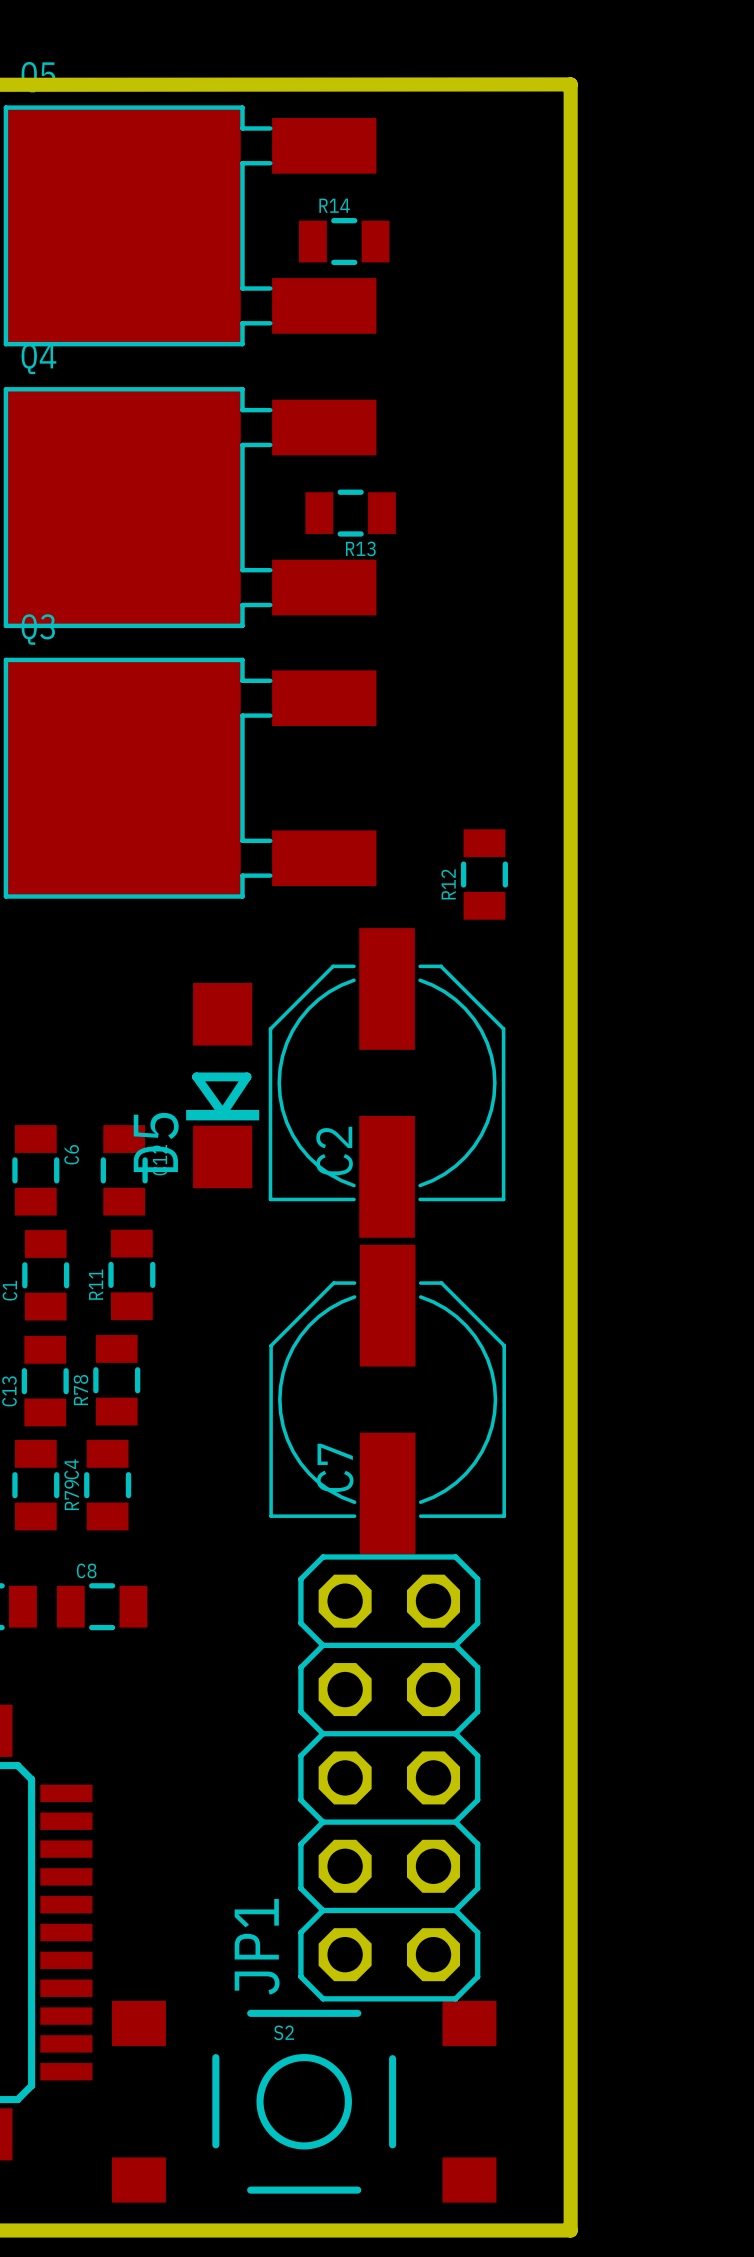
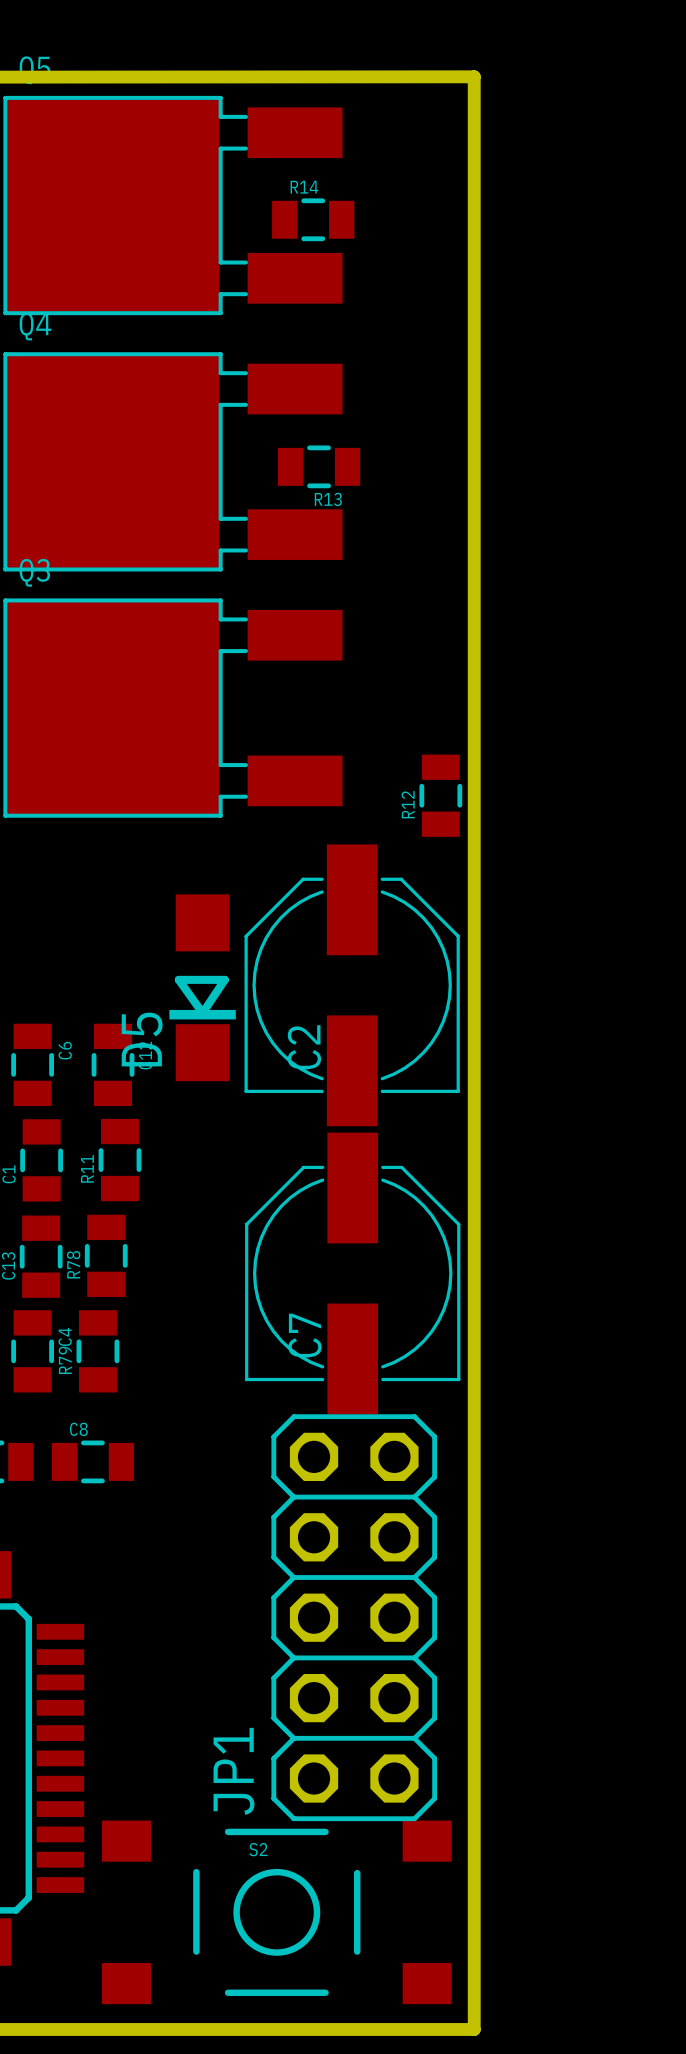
board edge: (521, 84) (570, 84) (570, 2230) (521, 2230) -> (474, 76) (474, 2029)

